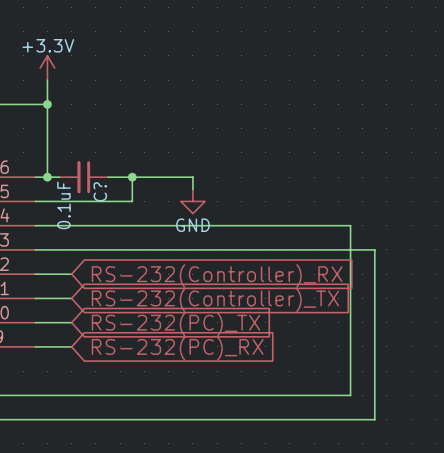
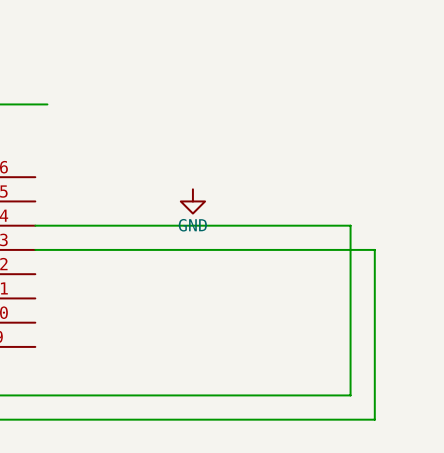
power symbol: +3.3V (47, 68) -> none
wire: (47, 80) (47, 177) -> none
junction: (47, 104) -> none
wire: (35, 177) (59, 177) -> none
junction: (47, 177) -> none
C?: 0.1uF (83, 177) -> none
wire: (108, 177) (192, 177) (192, 189) -> none
wire: (132, 177) (132, 201) (35, 201) -> none
junction: (132, 177) -> none
wire: (35, 274) (71, 274) -> none
global label: RS-232(Controller)_RX (217, 275) -> none
wire: (35, 298) (71, 298) -> none
global label: RS-232(Controller)_TX (215, 300) -> none
wire: (35, 322) (71, 322) -> none
global label: RS-232(PC)_TX (175, 324) -> none
wire: (35, 346) (71, 346) -> none
global label: RS-232(PC)_RX (177, 348) -> none

